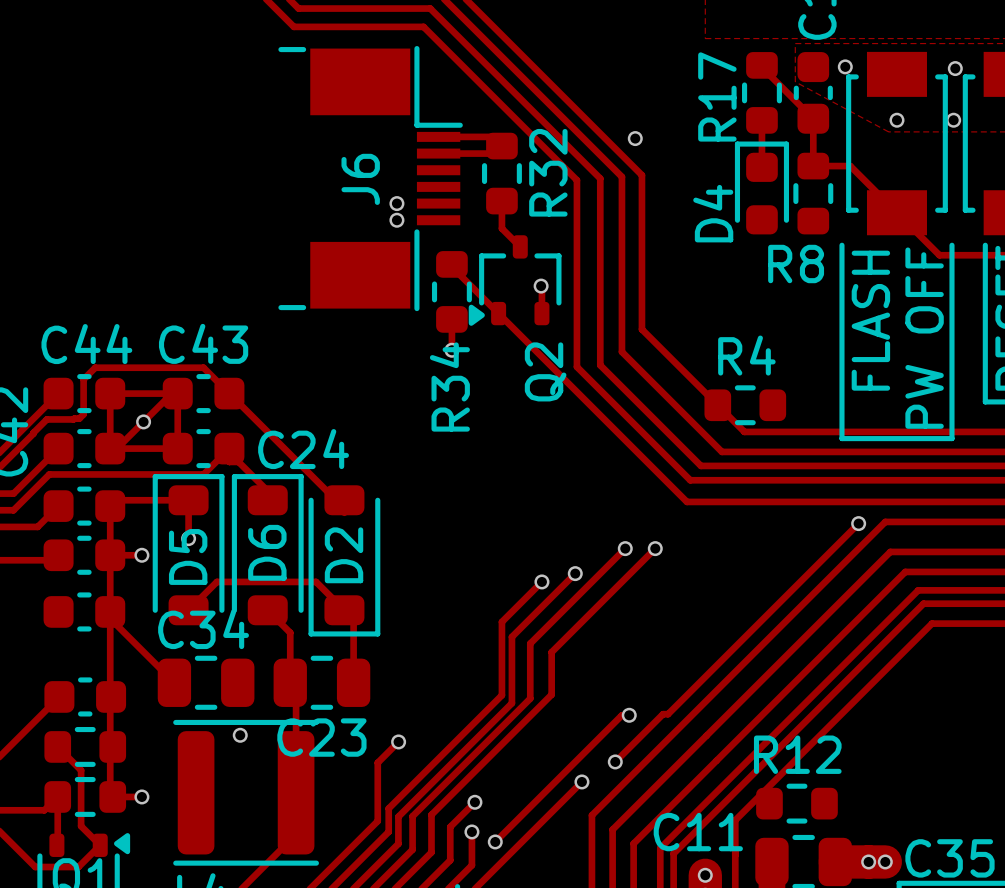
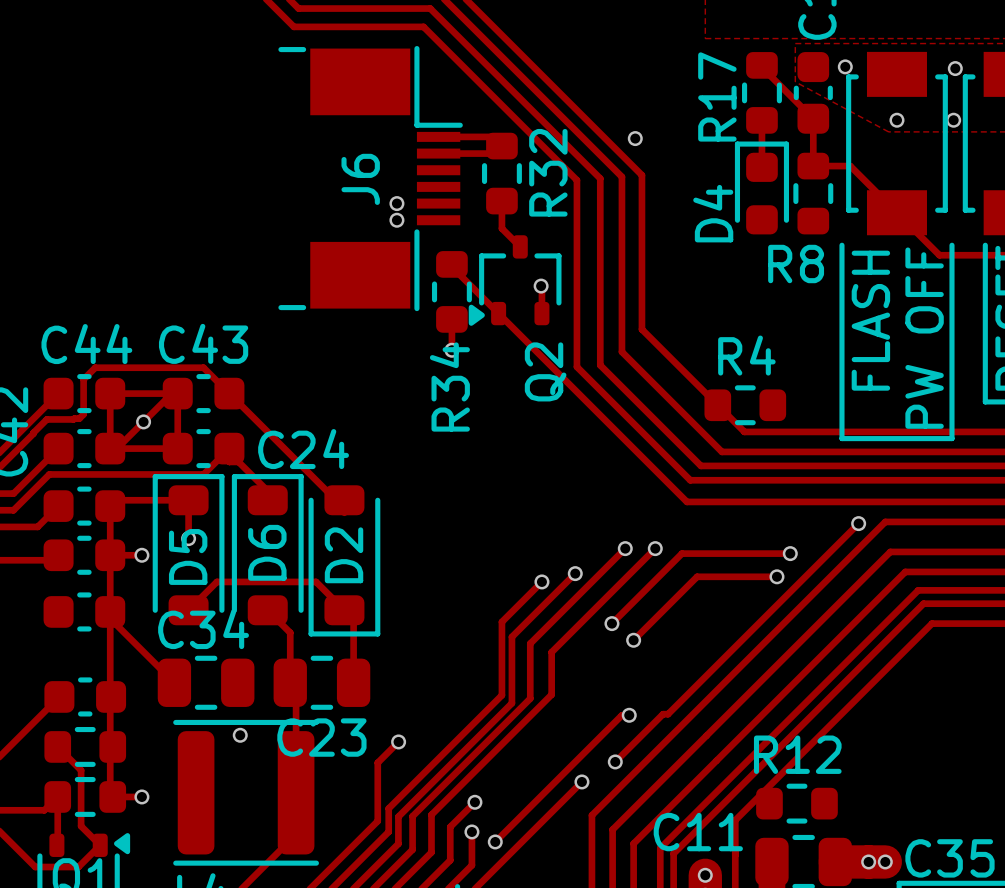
track: none -> (790, 553) (681, 553) (611, 623)
via: none -> (790, 553)
track: none -> (776, 576) (697, 576) (633, 640)
via: none -> (776, 576)
via: none -> (611, 623)
via: none -> (633, 640)

